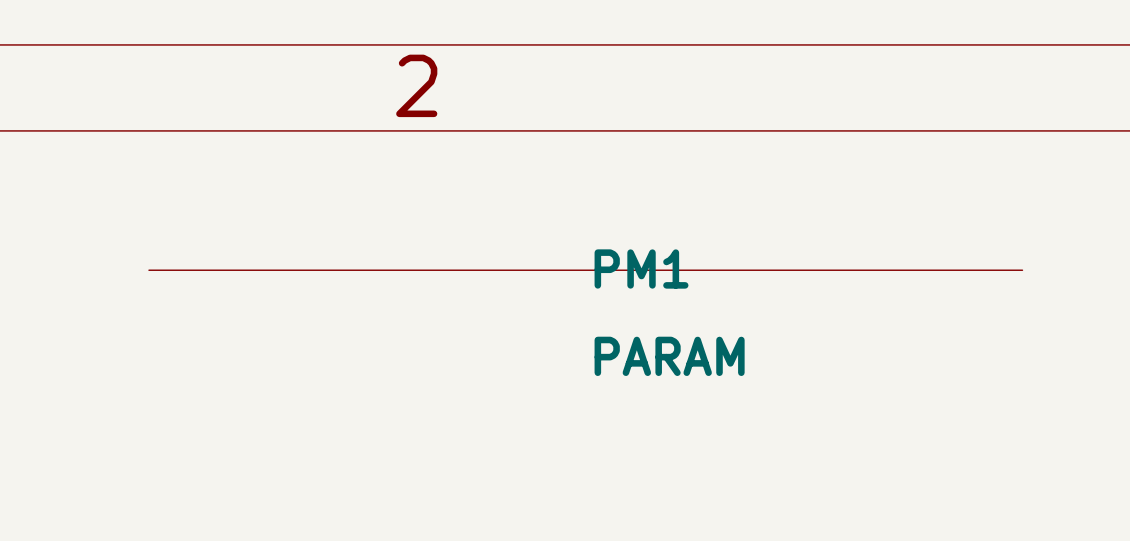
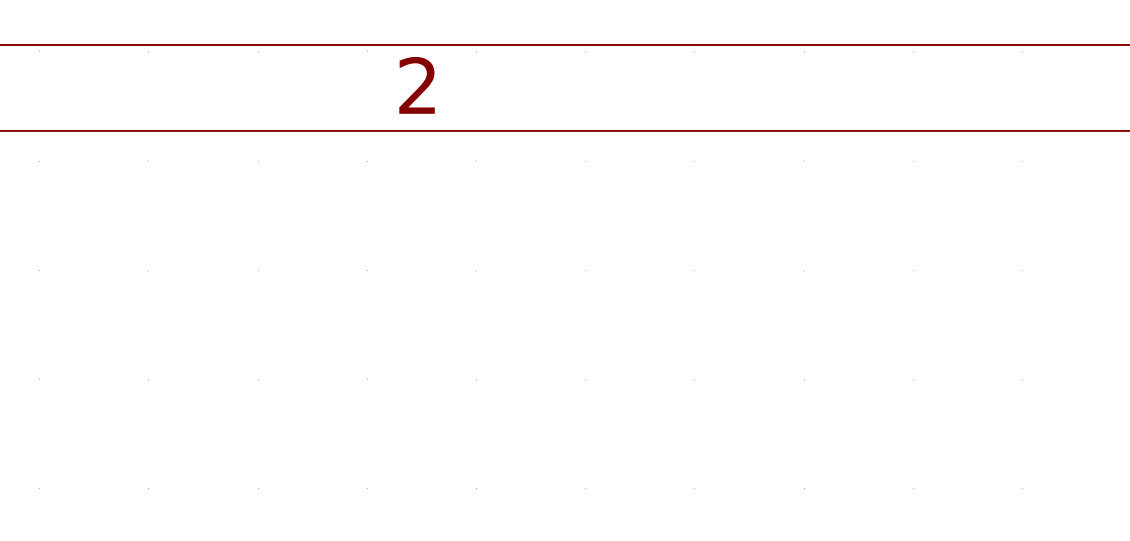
PM1: PARAM (585, 270) -> none

